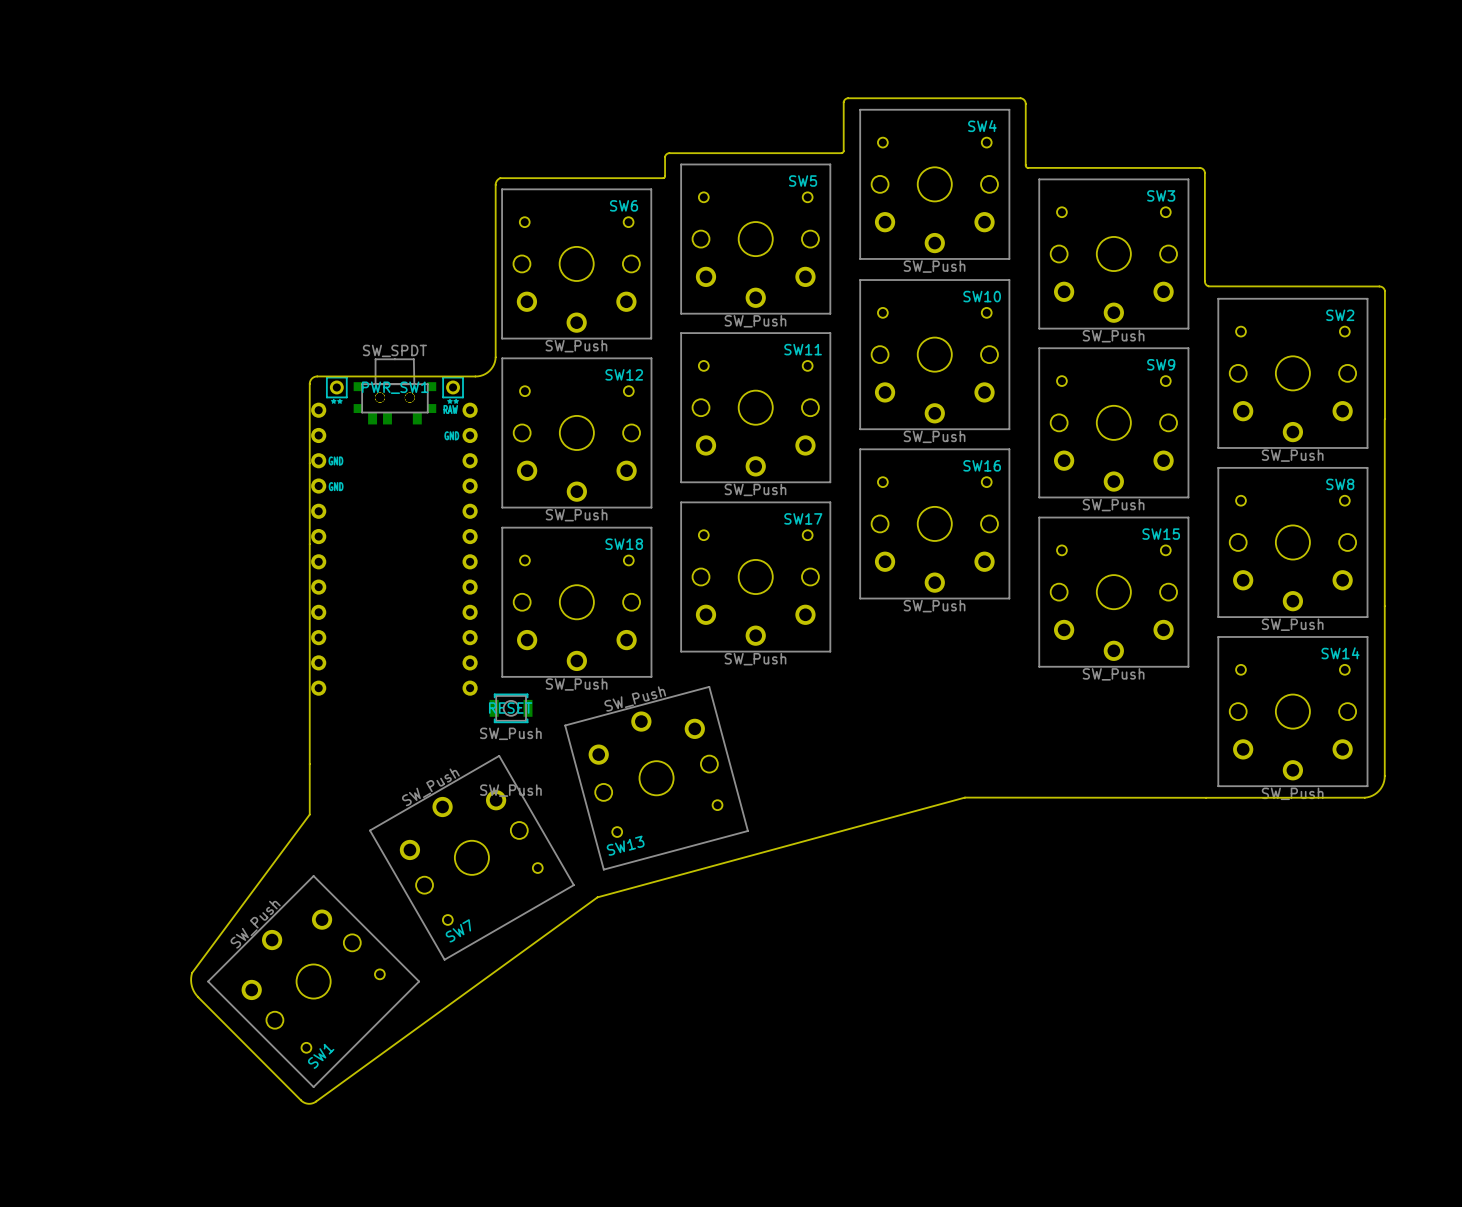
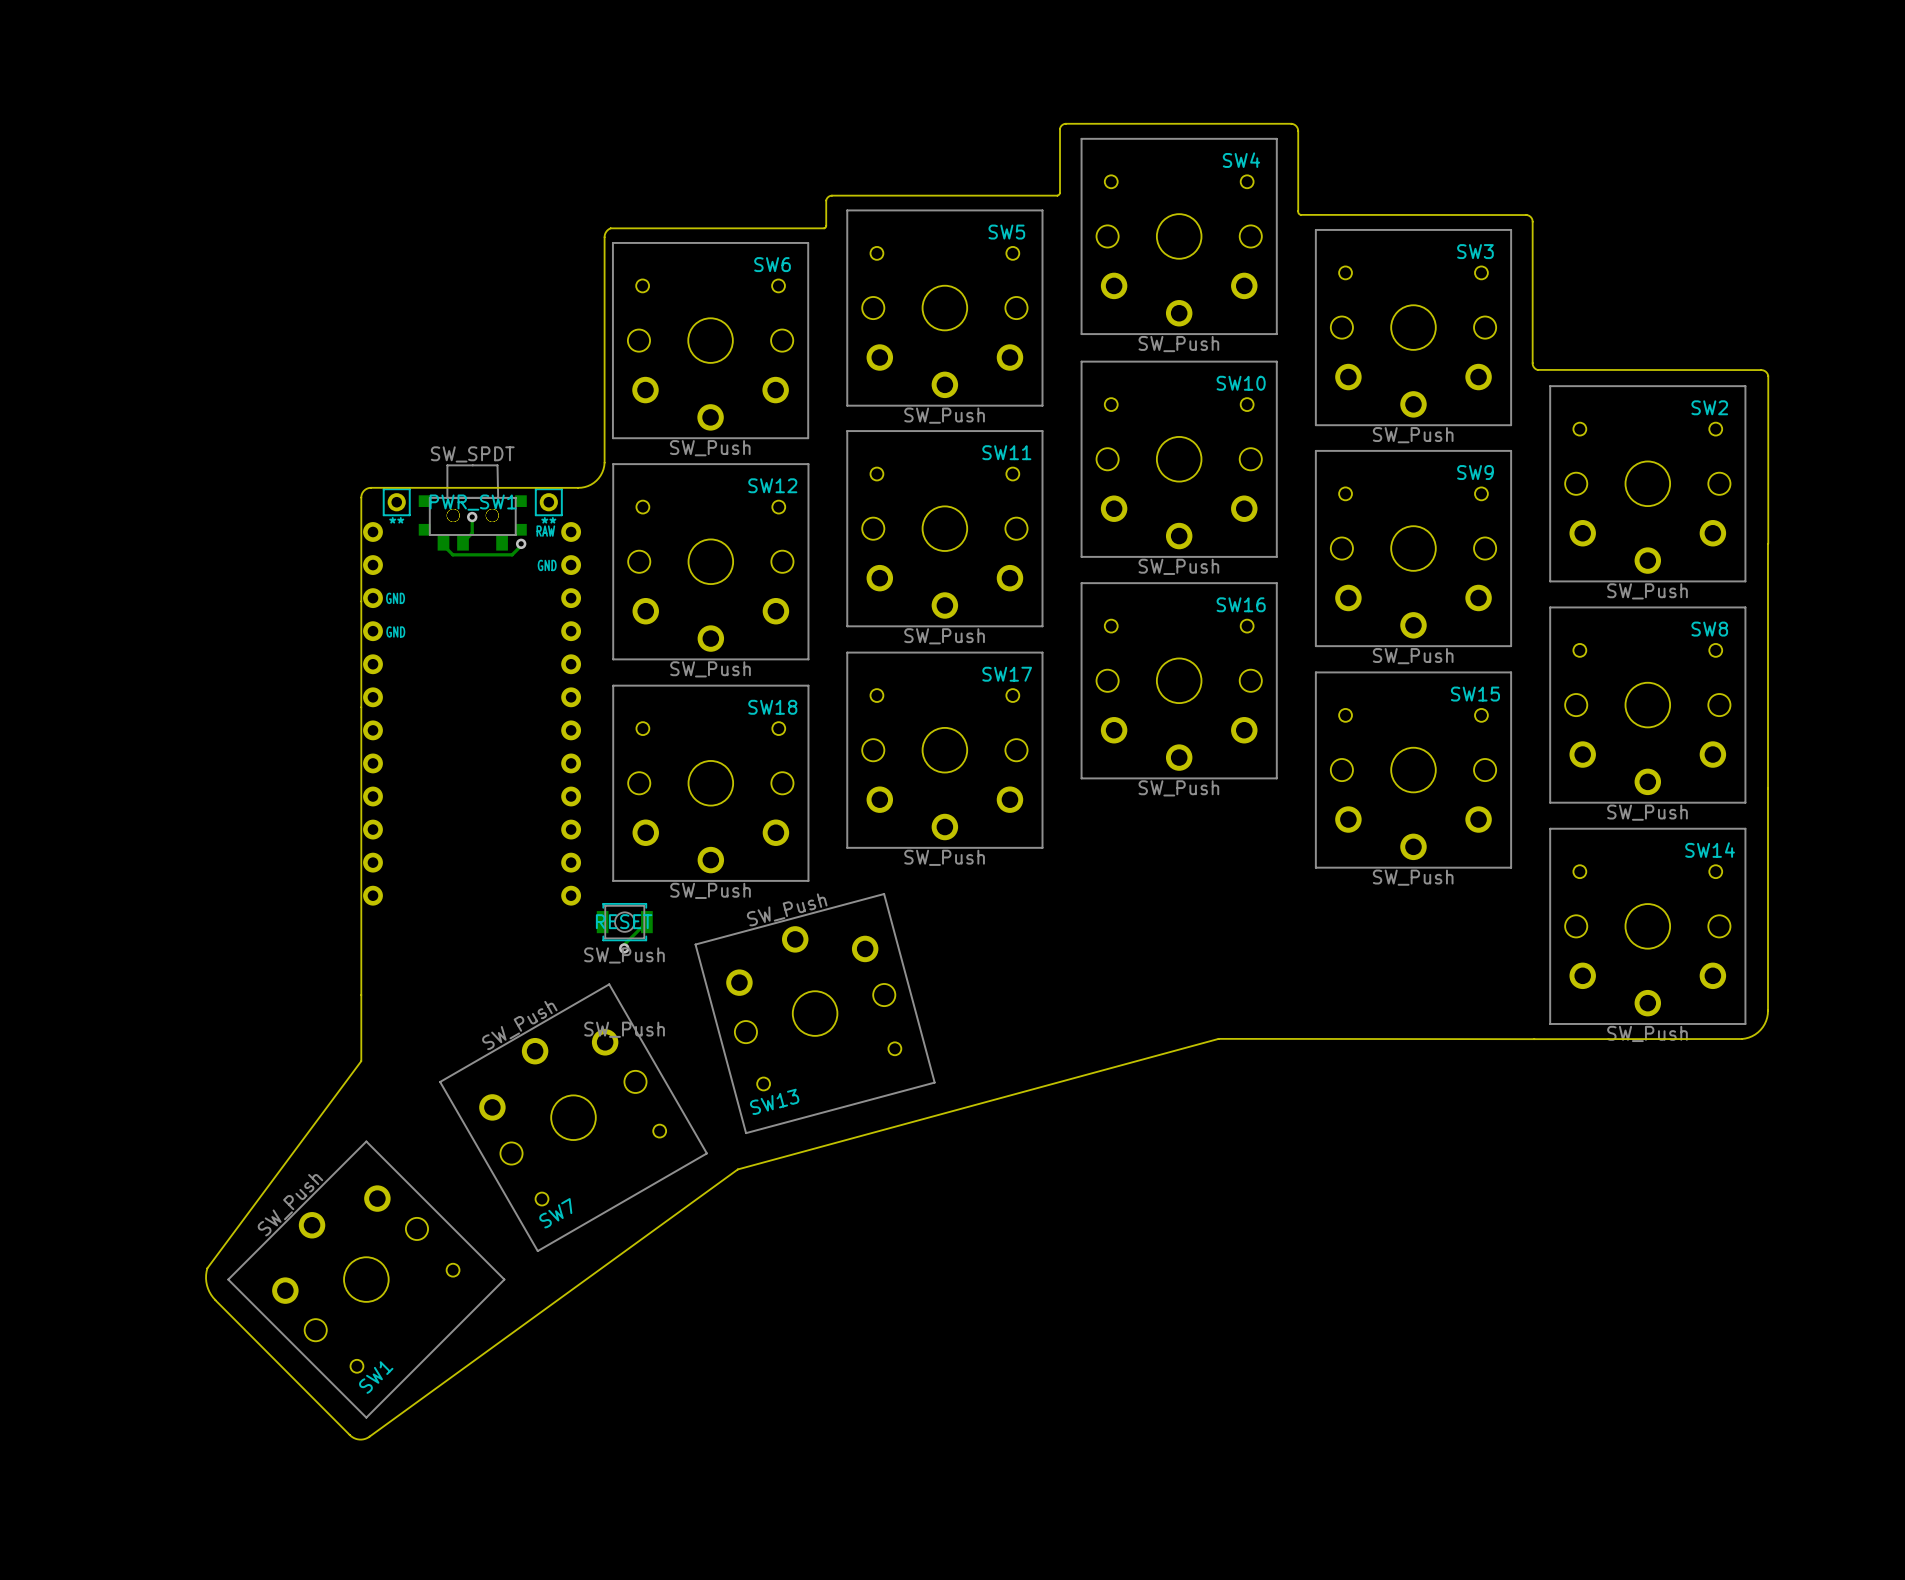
track: none -> (472, 517) (472, 533) (463, 542)
via: none -> (472, 517)
track: none -> (443, 542) (443, 545) (452, 554) (512, 554) (521, 543)
via: none -> (521, 543)
track: none -> (646, 922) (624, 944) (624, 948)
via: none -> (624, 948)

